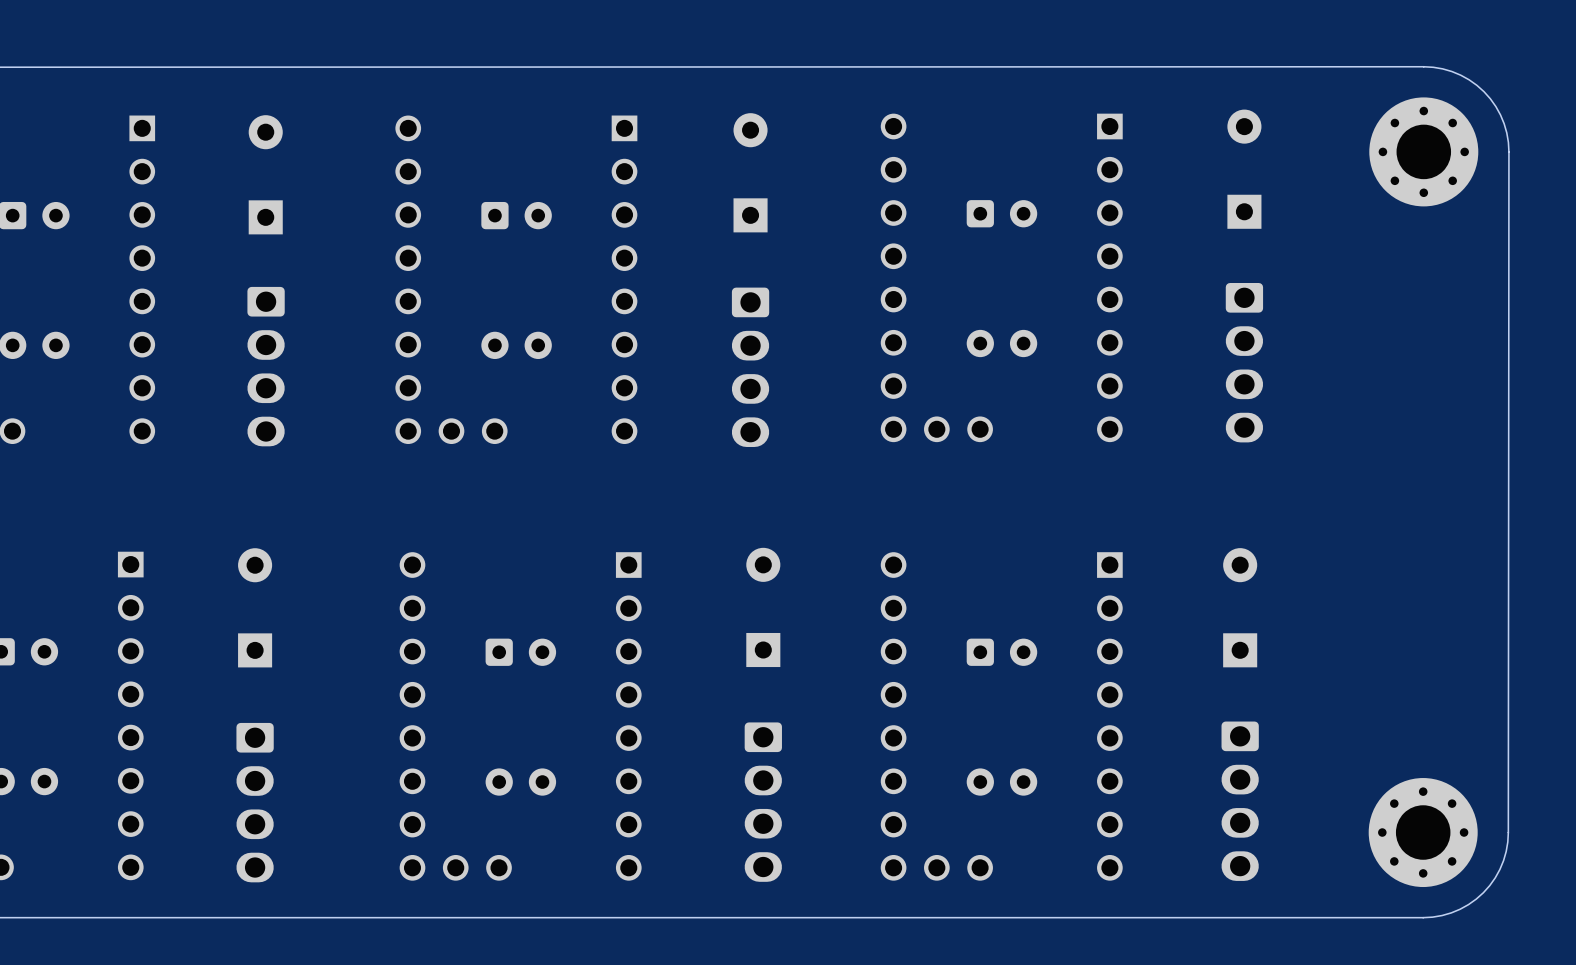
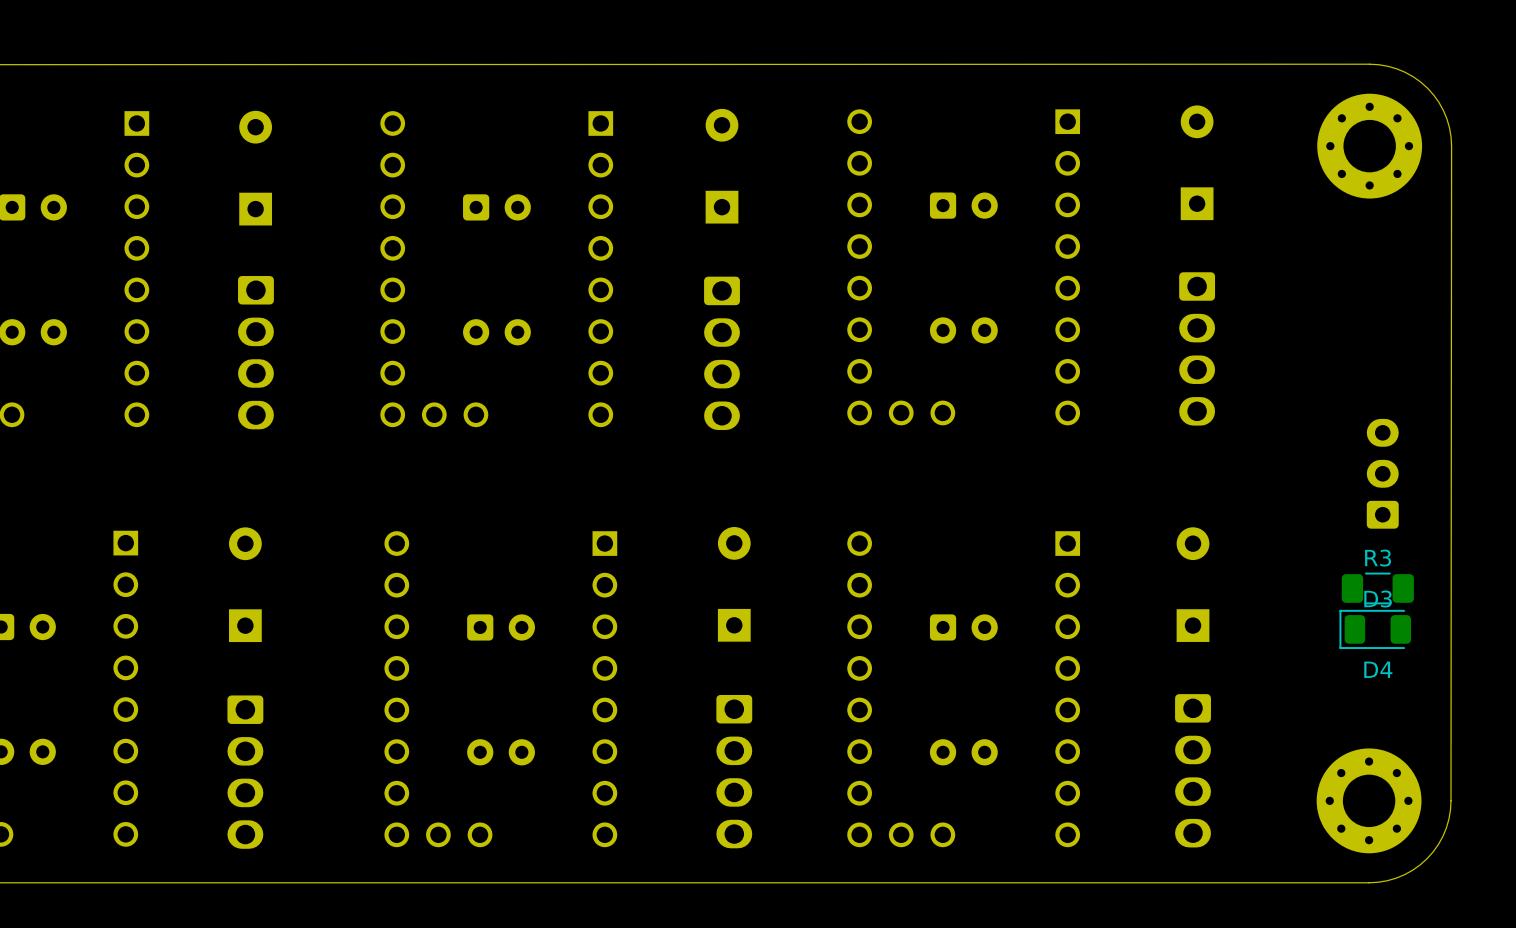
part: none -> (1382, 473)
R3: none -> (1377, 588)
D3: none -> (1375, 629)
D4: none -> (1378, 669)

